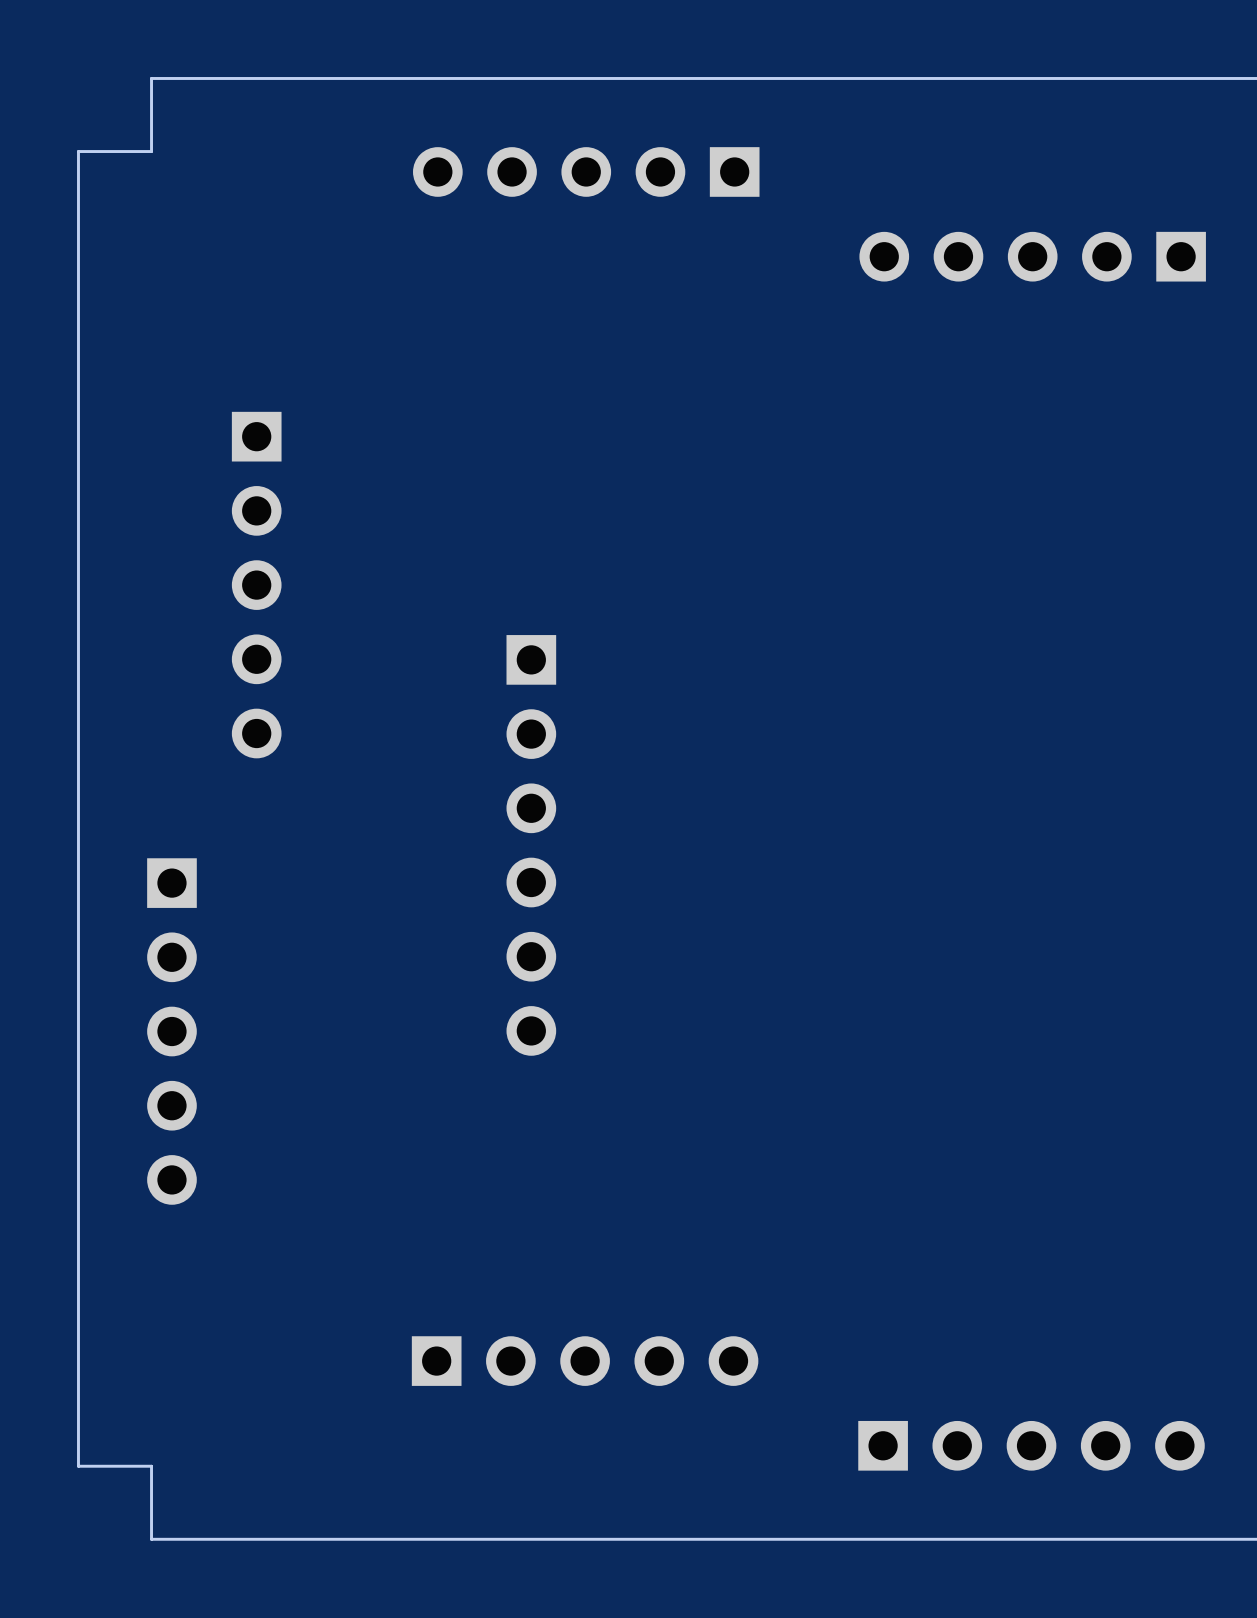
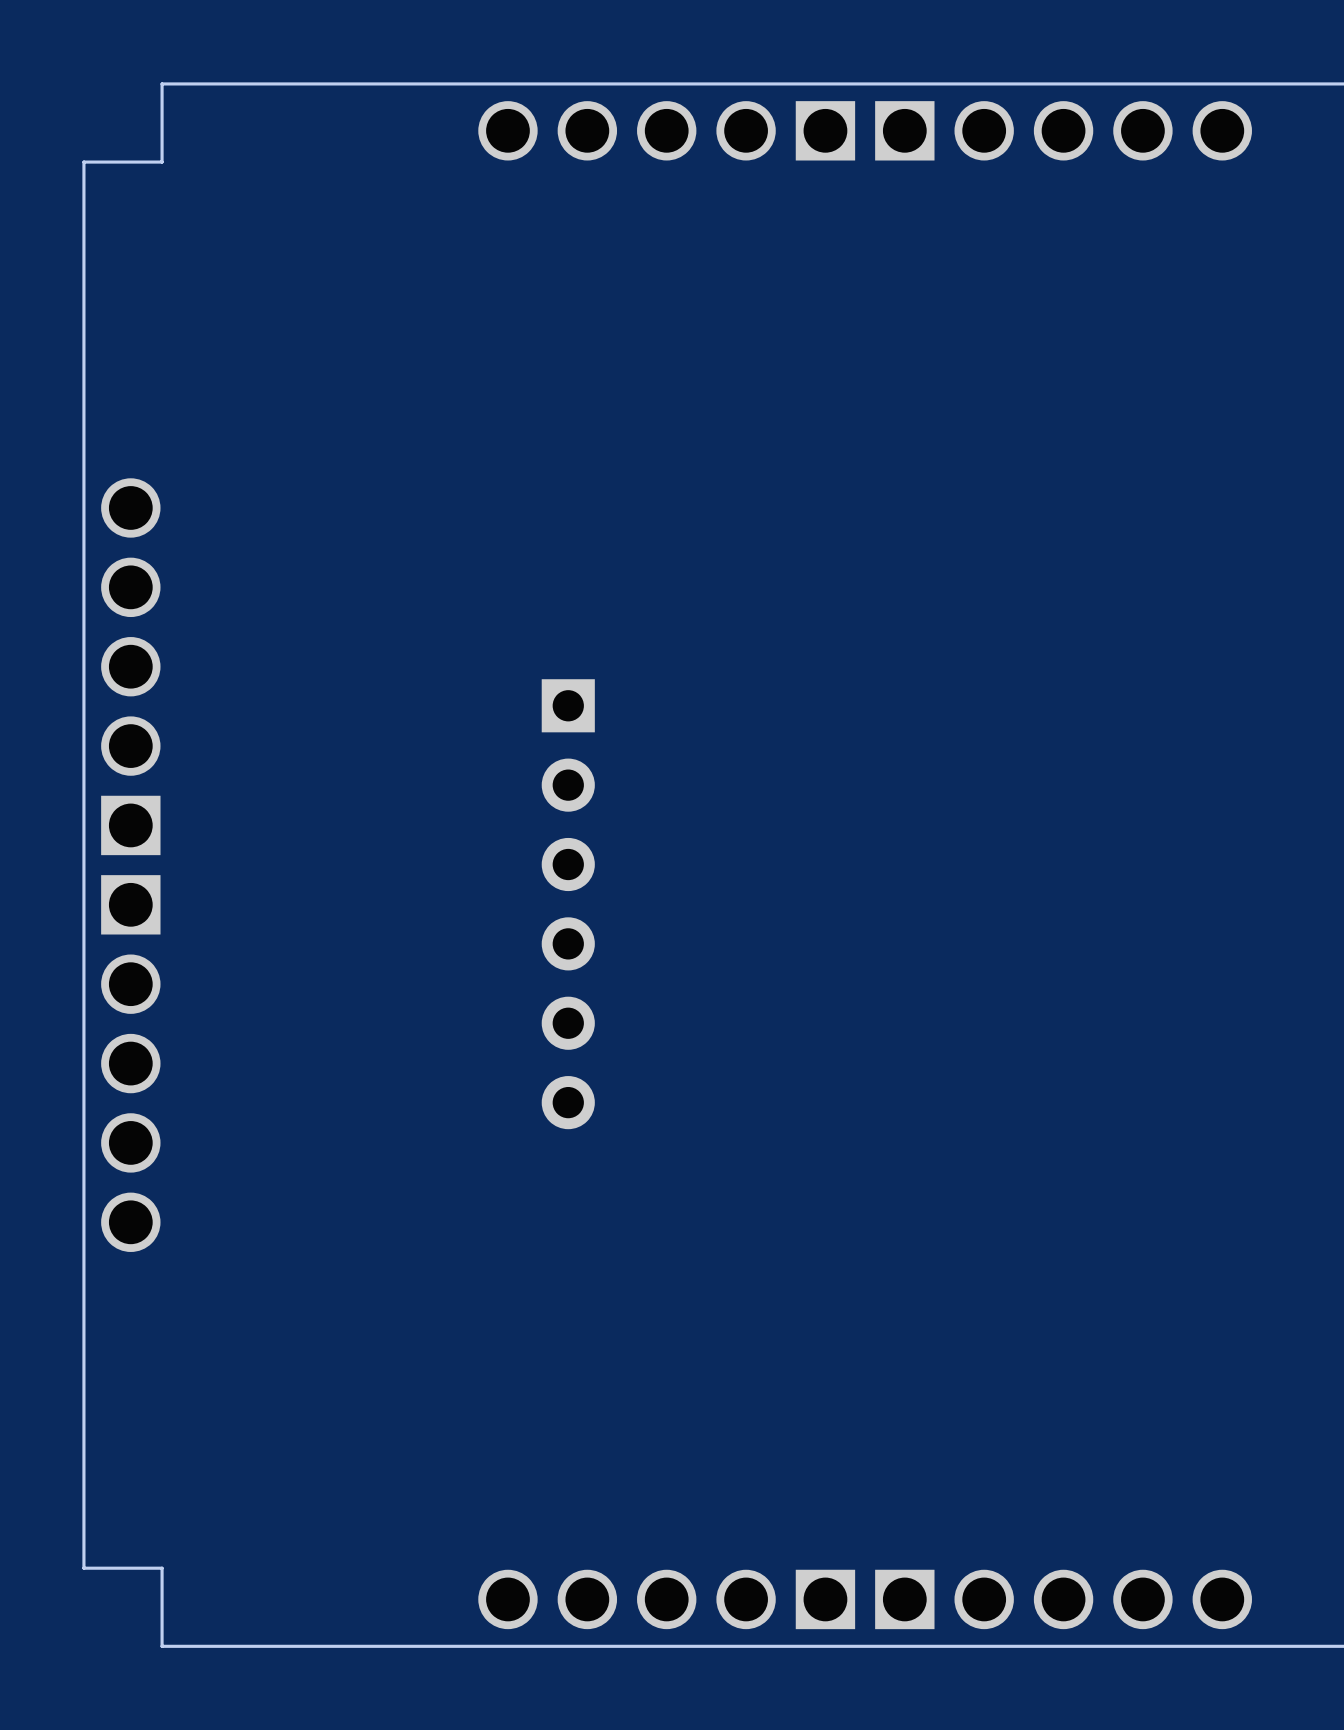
part: none -> (865, 130)
part: (586, 171) -> none
part: (1032, 256) -> none
part: (256, 585) -> none
part: none -> (130, 865)
part: (171, 1031) -> none
part: (585, 1361) -> none
part: (1031, 1445) -> none
part: none -> (865, 1599)

